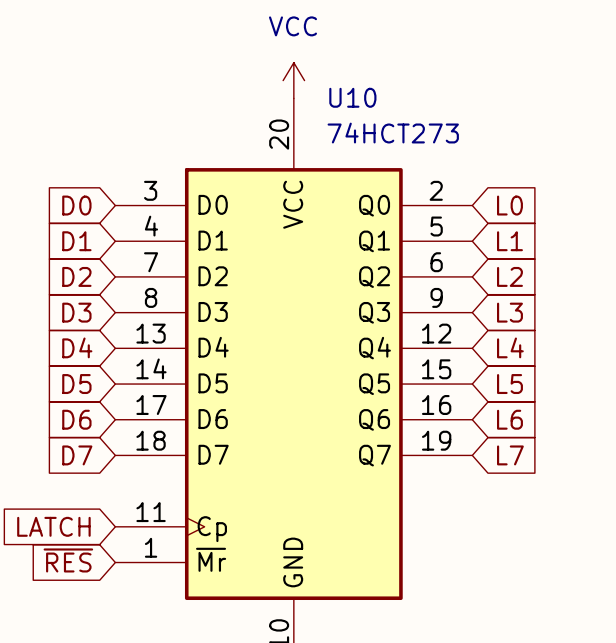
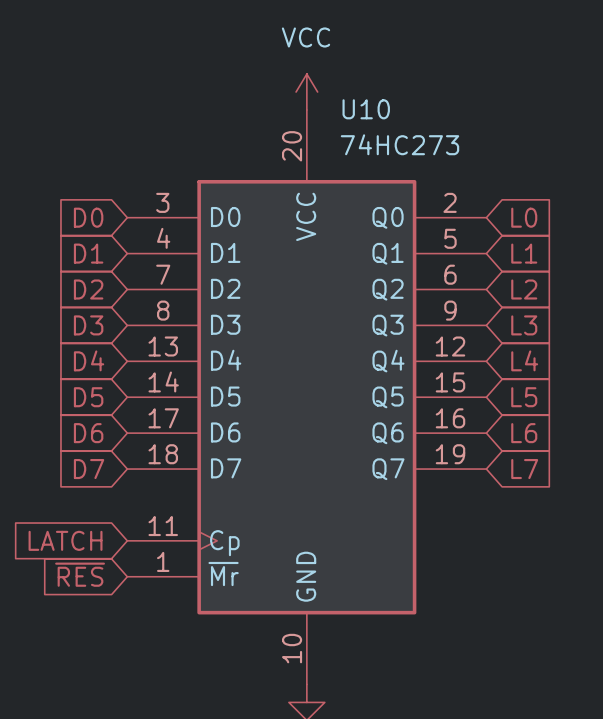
U10 value: 74HCT273 (393, 133) -> 74HC273 (399, 144)

